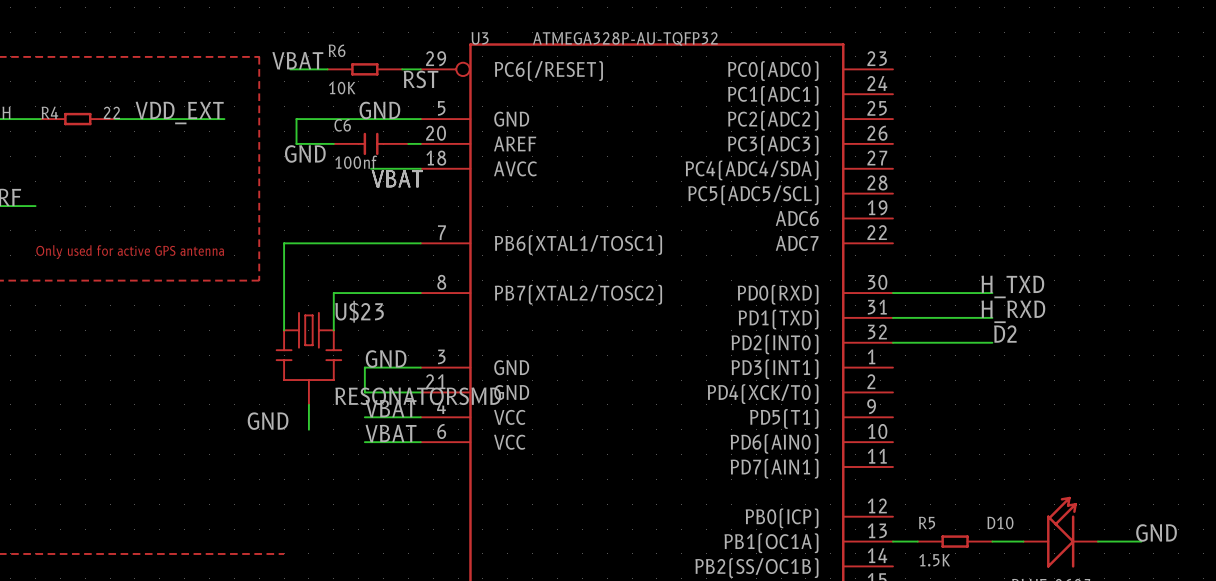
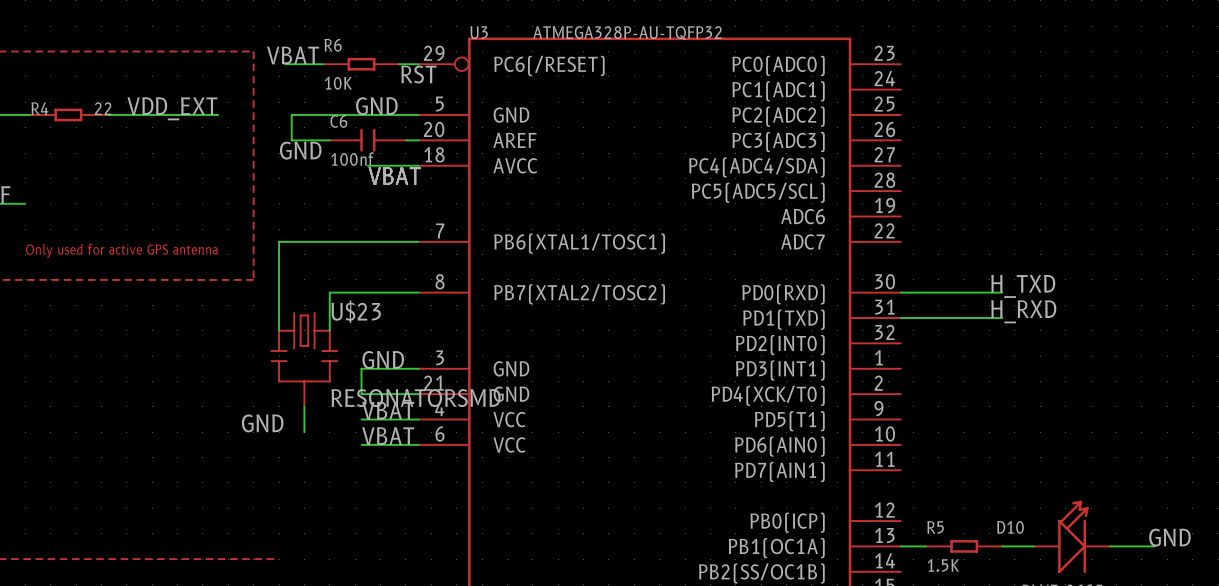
label: D2 (1005, 334) -> none
wire: (892, 342) (992, 342) -> none

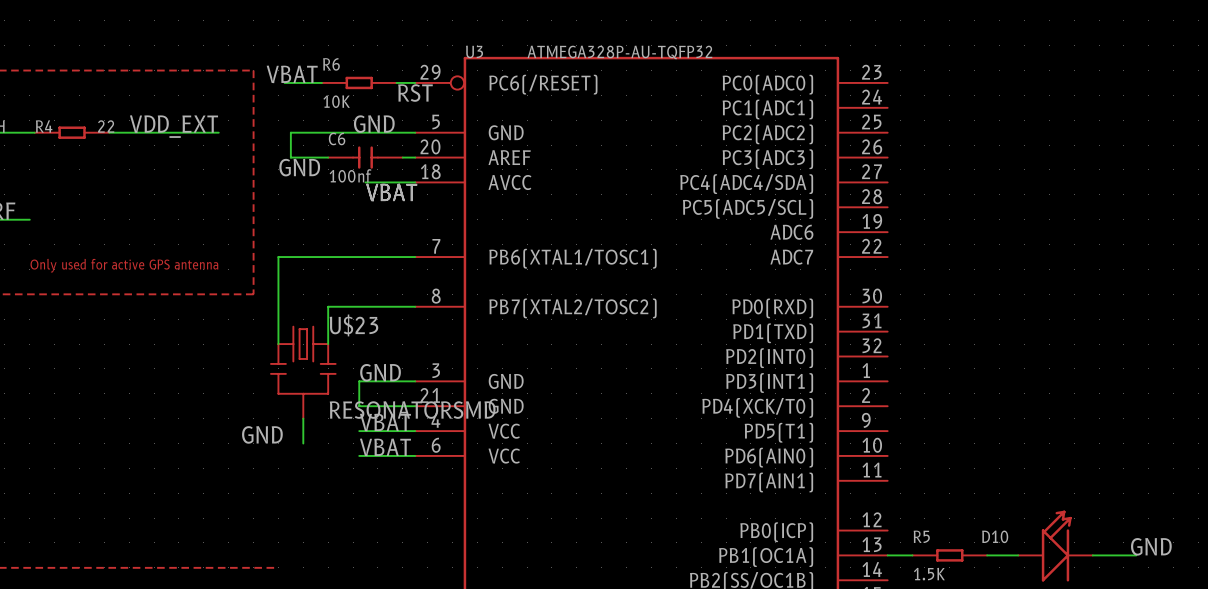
label: H_TXD (1023, 286) -> none
wire: (900, 292) (1002, 292) -> none
label: H_RXD (1023, 311) -> none
wire: (900, 318) (1002, 318) -> none

